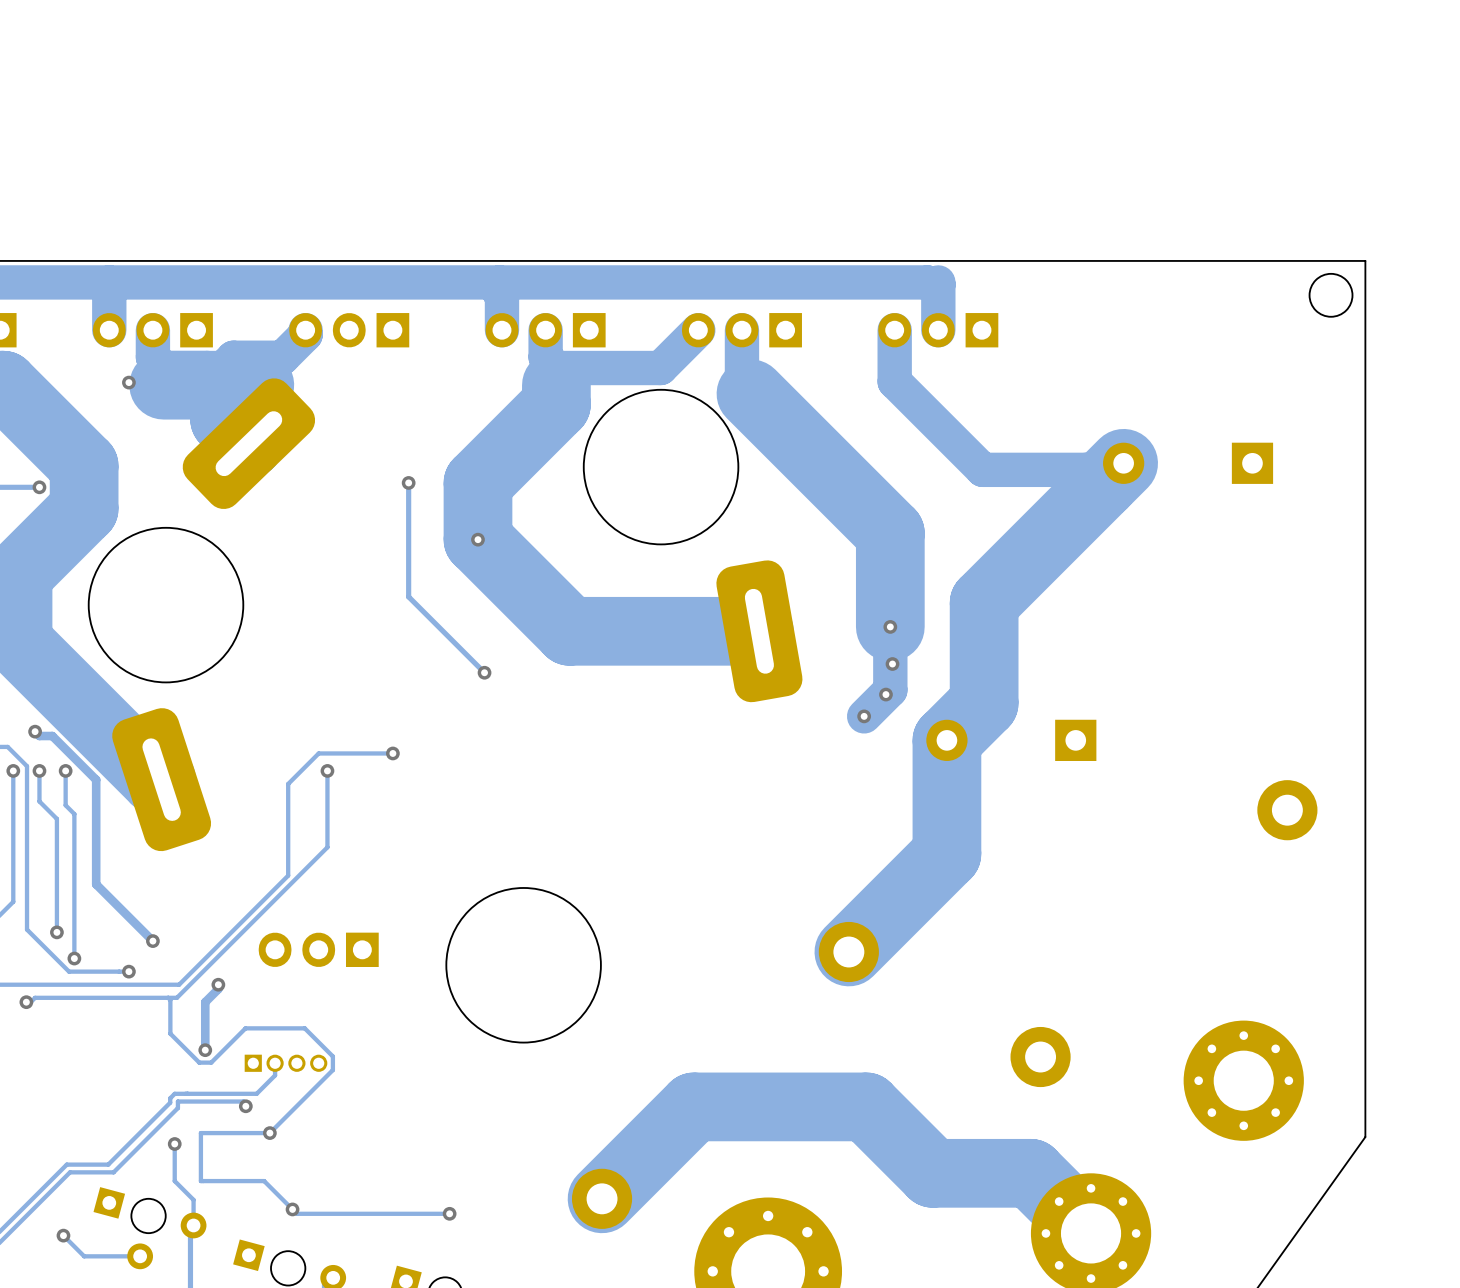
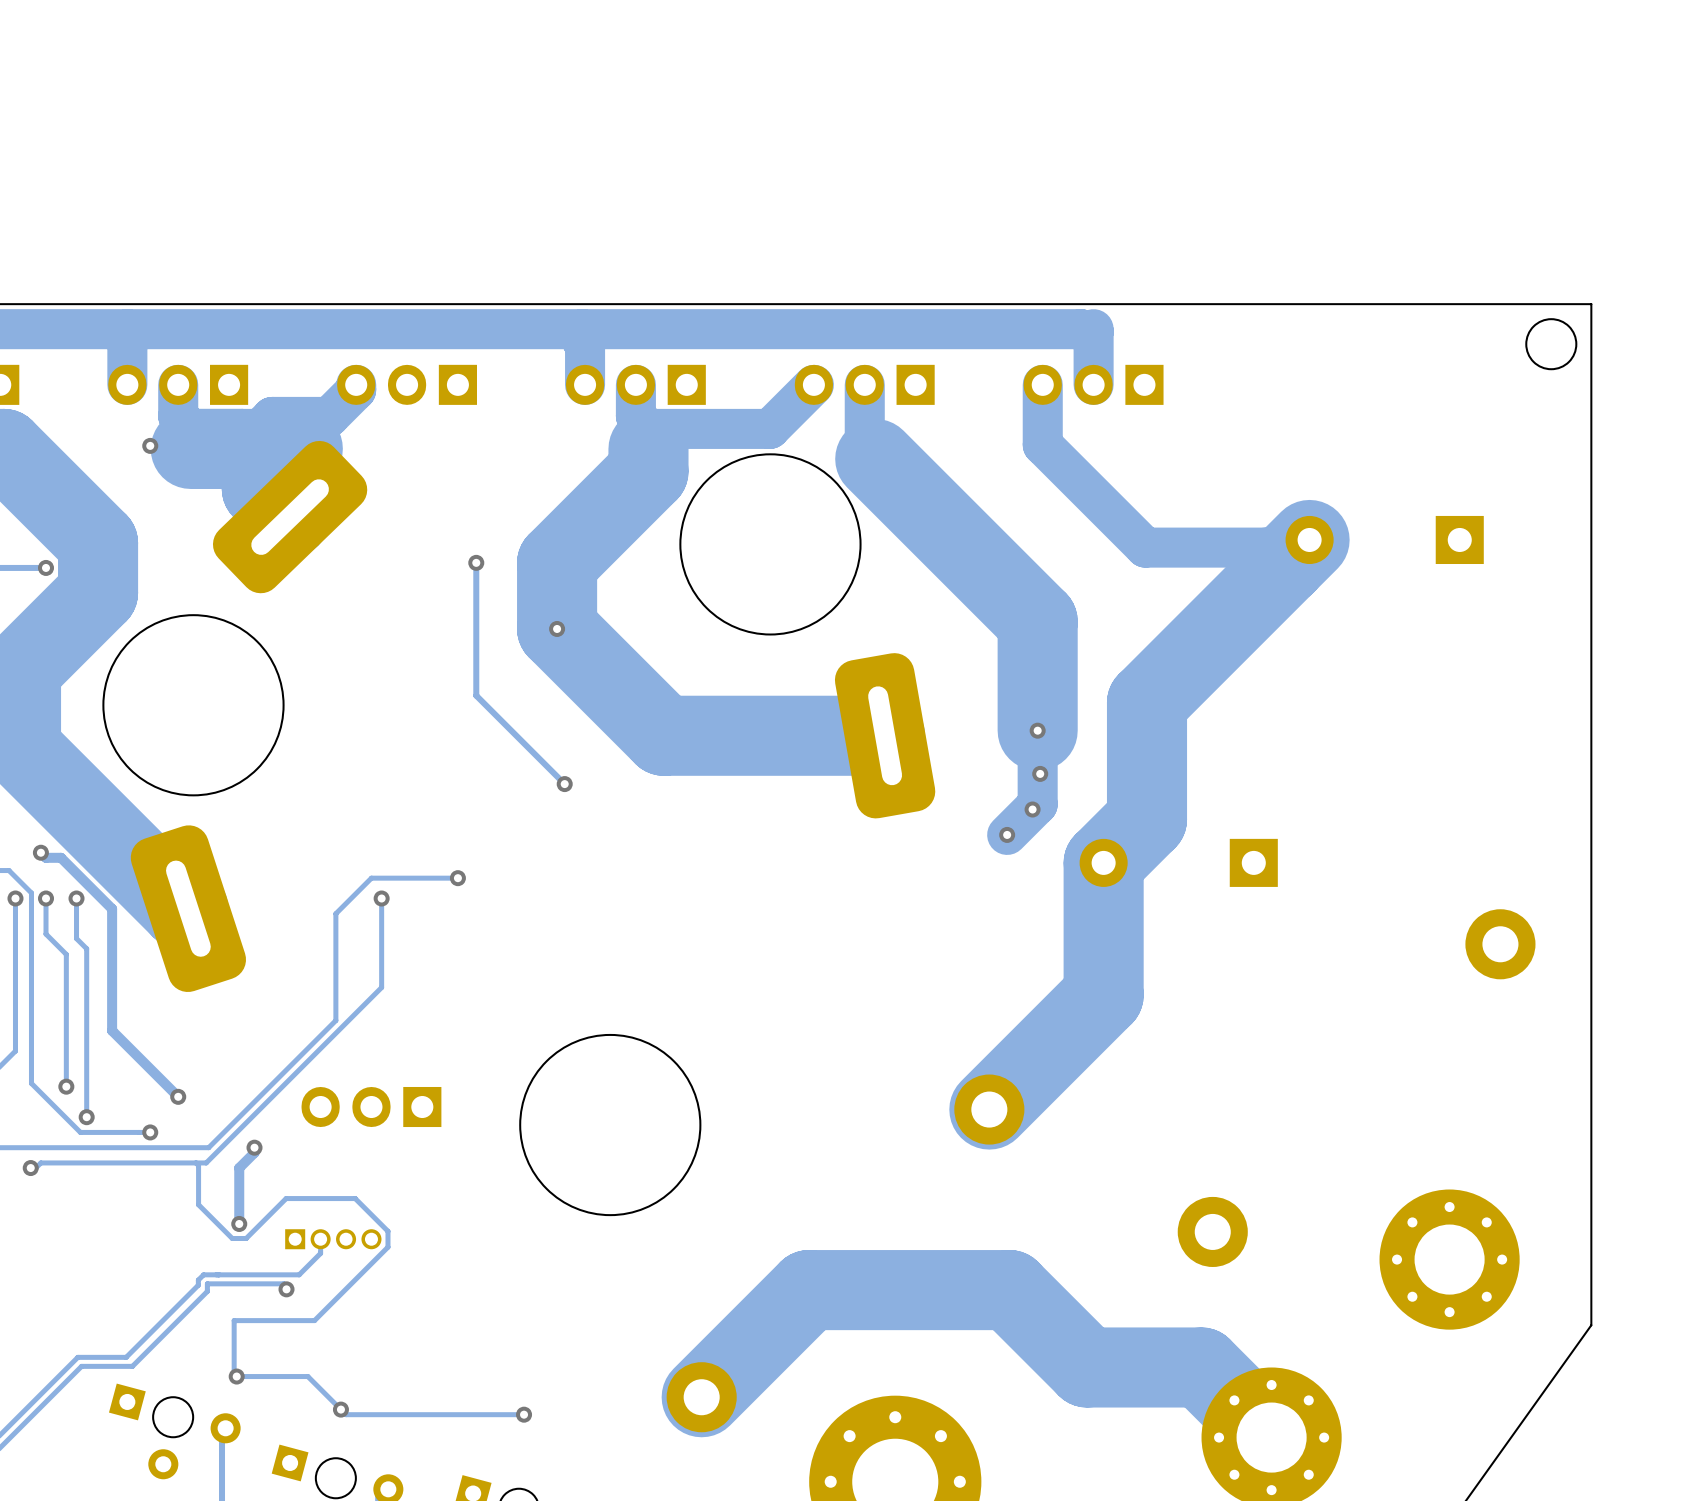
via: (269, 1133) -> none
track: (174, 1143) (174, 1181) (193, 1199) (193, 1225) -> none
via: (174, 1143) -> none
via: none -> (236, 1376)
track: (63, 1235) (84, 1256) (140, 1256) -> none
via: (63, 1235) -> none

